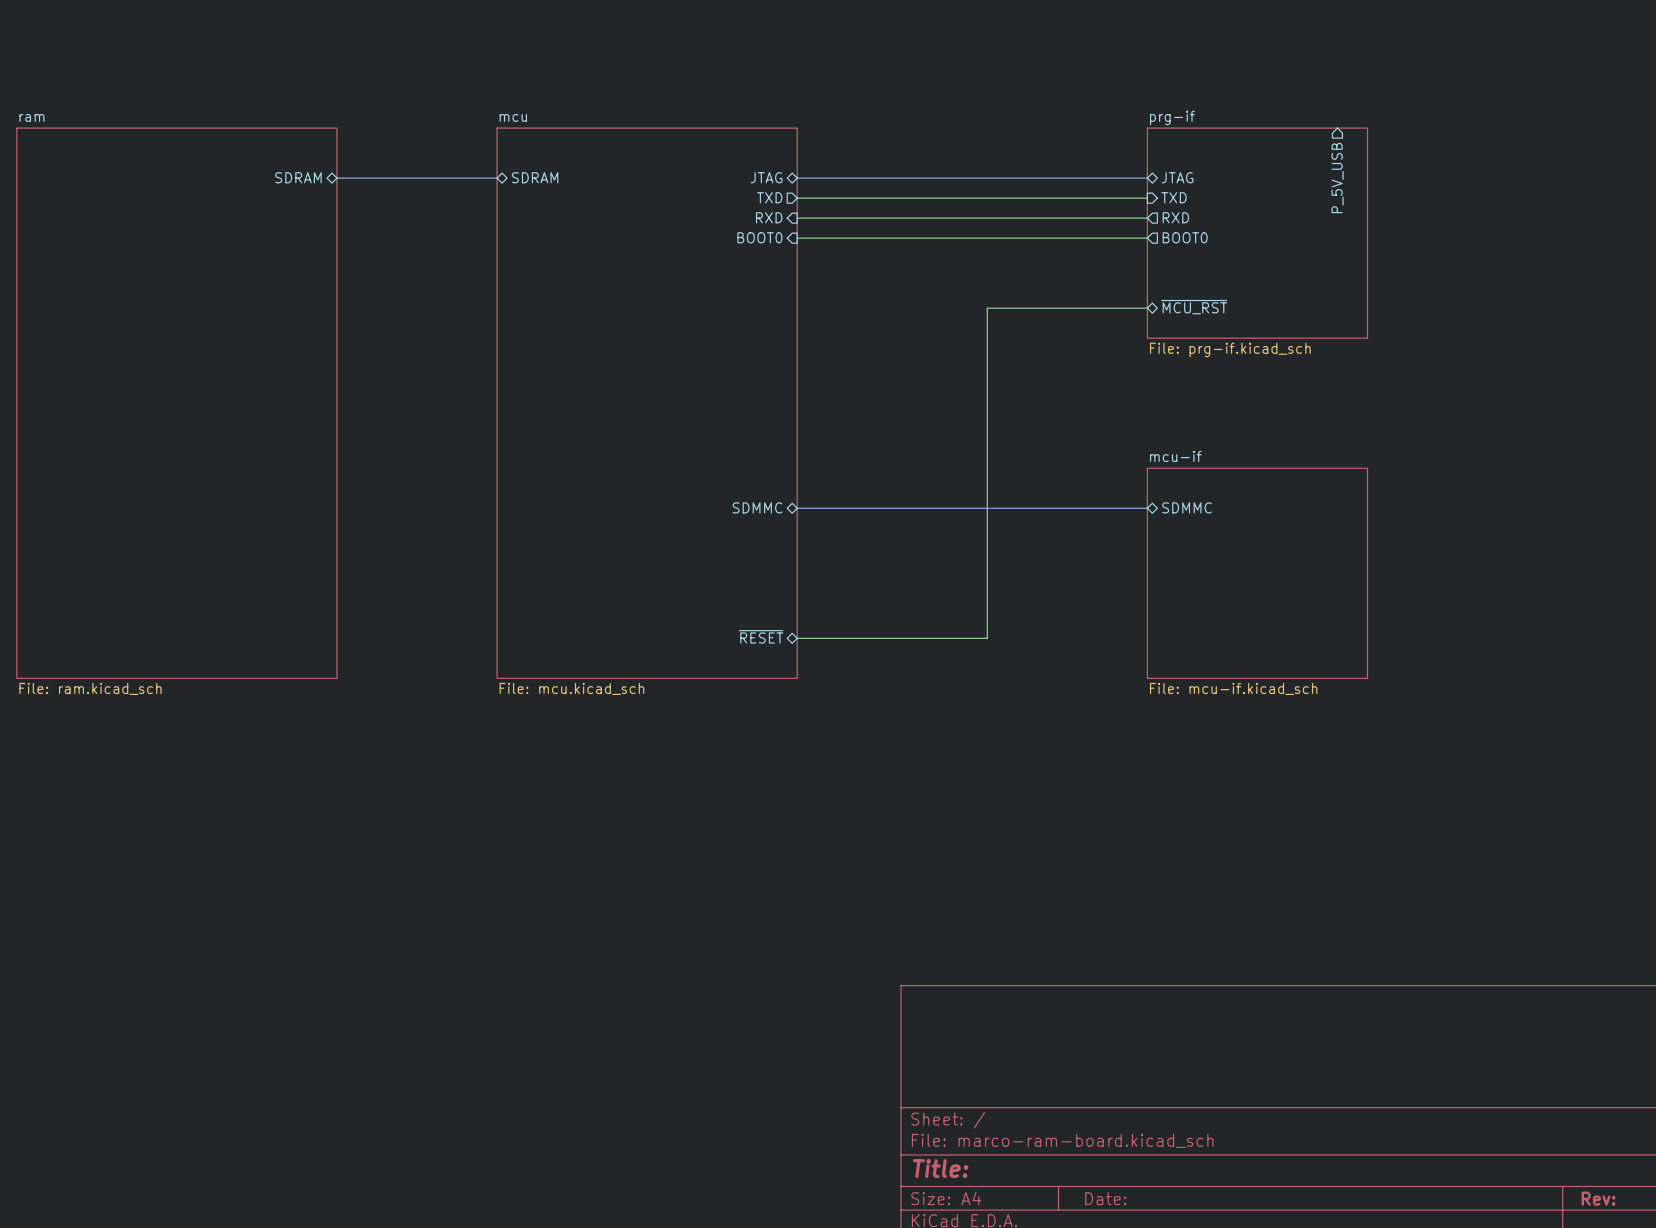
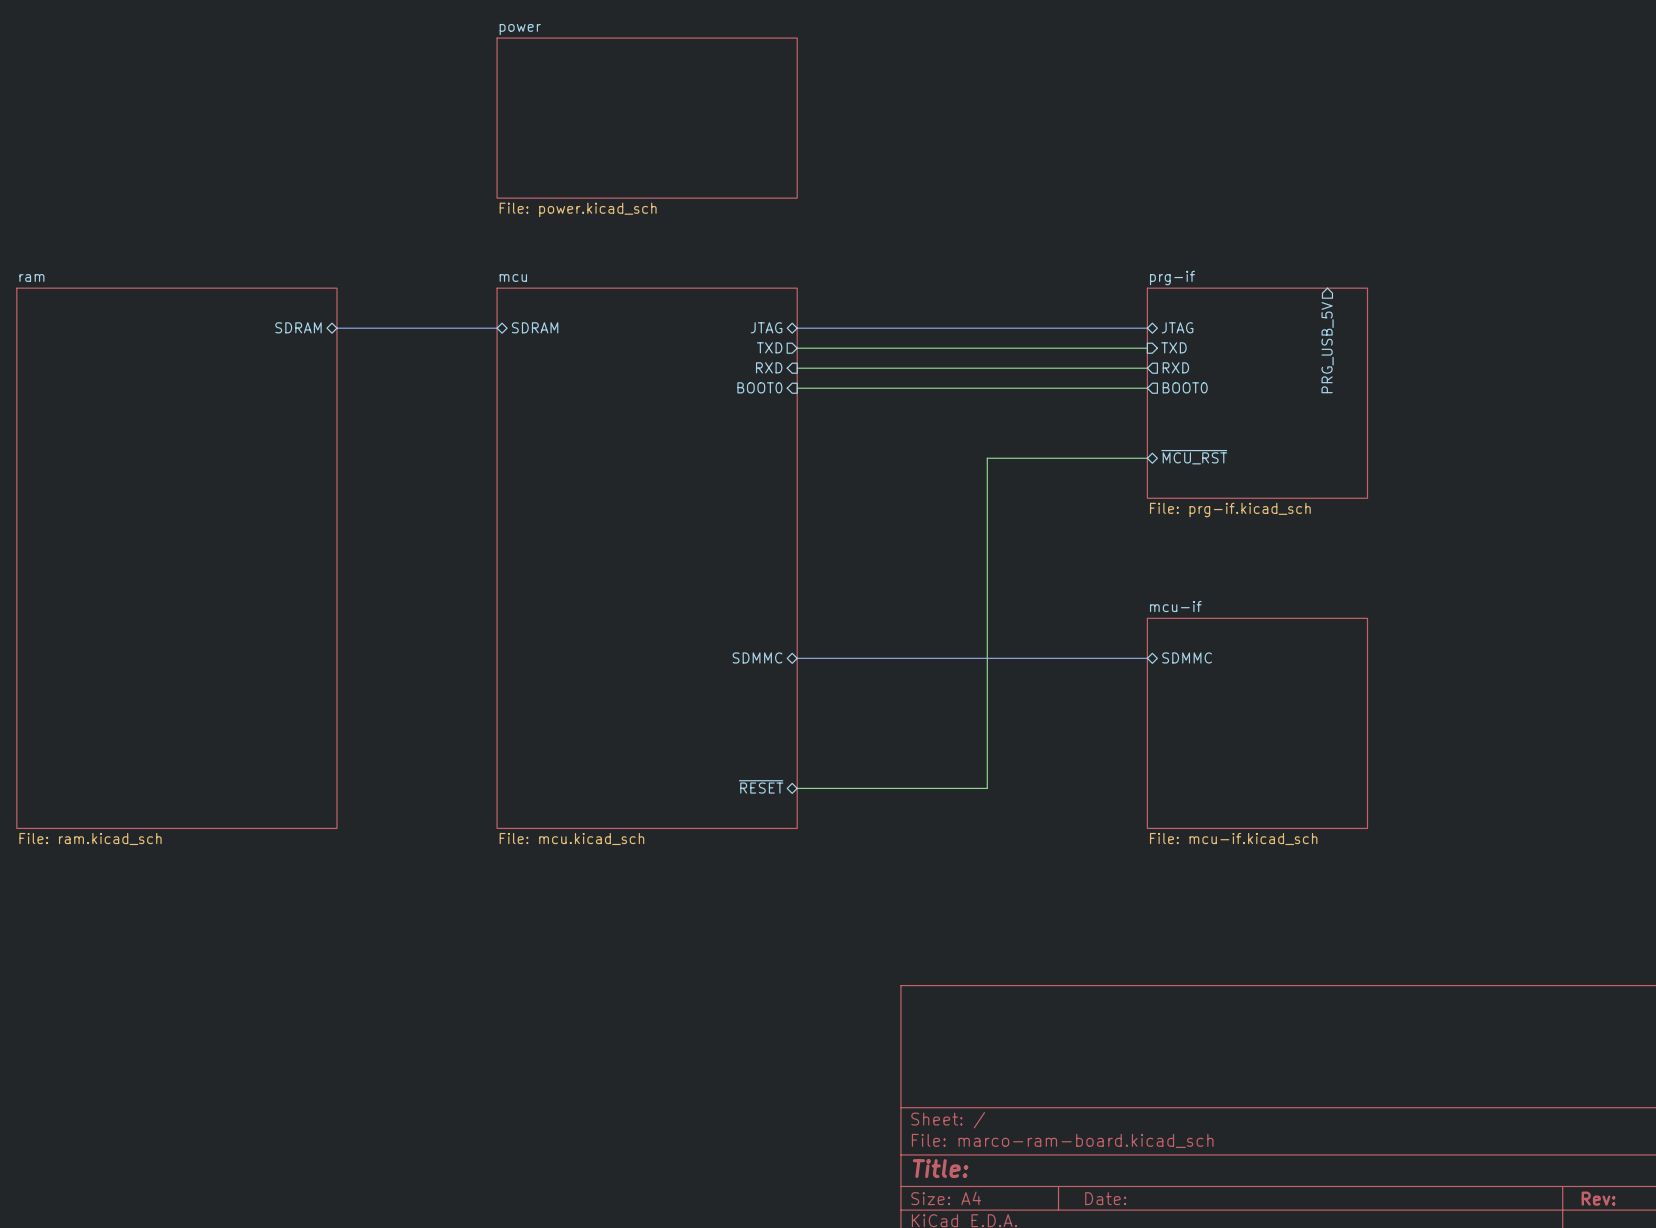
sheet power: none -> File: power.kicad_sch (647, 118)
sheet pin: SDRAM (298, 177) -> none
sheet pin: SDRAM (535, 177) -> none
sheet pin position: JTAG (766, 177) -> JTAG (766, 327)
sheet pin position: JTAG (1177, 177) -> JTAG (1177, 327)
bus: (336, 178) (497, 178) -> (336, 328) (497, 328)
bus: (797, 178) (1147, 178) -> (797, 328) (1147, 328)
sheet pin: P_5V_USB (1337, 178) -> none
sheet pin position: TXD (769, 197) -> TXD (769, 347)
sheet pin position: TXD (1173, 197) -> TXD (1173, 347)
wire: (797, 198) (1147, 198) -> (797, 348) (1147, 348)
sheet pin position: RXD (769, 217) -> RXD (769, 367)
sheet pin position: RXD (1175, 217) -> RXD (1175, 367)
wire: (797, 218) (1147, 218) -> (797, 368) (1147, 368)
sheet prg-if position: (1257, 233) -> (1257, 393)
sheet pin position: BOOT0 (759, 237) -> BOOT0 (759, 387)
sheet pin position: BOOT0 (1185, 237) -> BOOT0 (1185, 387)
wire: (797, 238) (1147, 238) -> (797, 388) (1147, 388)
sheet pin position: ~{MCU_RST} (1194, 307) -> ~{MCU_RST} (1194, 457)
wire: (1147, 308) (987, 308) (987, 458) -> (1147, 458) (987, 458)
sheet pin: none -> SDRAM (298, 327)
sheet pin: none -> SDRAM (535, 327)
sheet pin: none -> PRG_USB_5V (1327, 347)
sheet ram: File: ram.kicad_sch (176, 403) -> none
sheet mcu: File: mcu.kicad_sch (647, 403) -> none
sheet pin position: SDMMC (757, 507) -> SDMMC (757, 657)
sheet pin position: SDMMC (1187, 507) -> SDMMC (1187, 657)
bus: (797, 508) (1147, 508) -> (797, 658) (1147, 658)
sheet ram: none -> File: ram.kicad_sch (176, 558)
sheet mcu: none -> File: mcu.kicad_sch (647, 558)
sheet mcu-if position: (1257, 573) -> (1257, 723)
sheet pin position: ~{RESET} (761, 636) -> ~{RESET} (761, 786)
wire: (797, 638) (987, 638) -> (797, 788) (987, 788) (987, 638)

